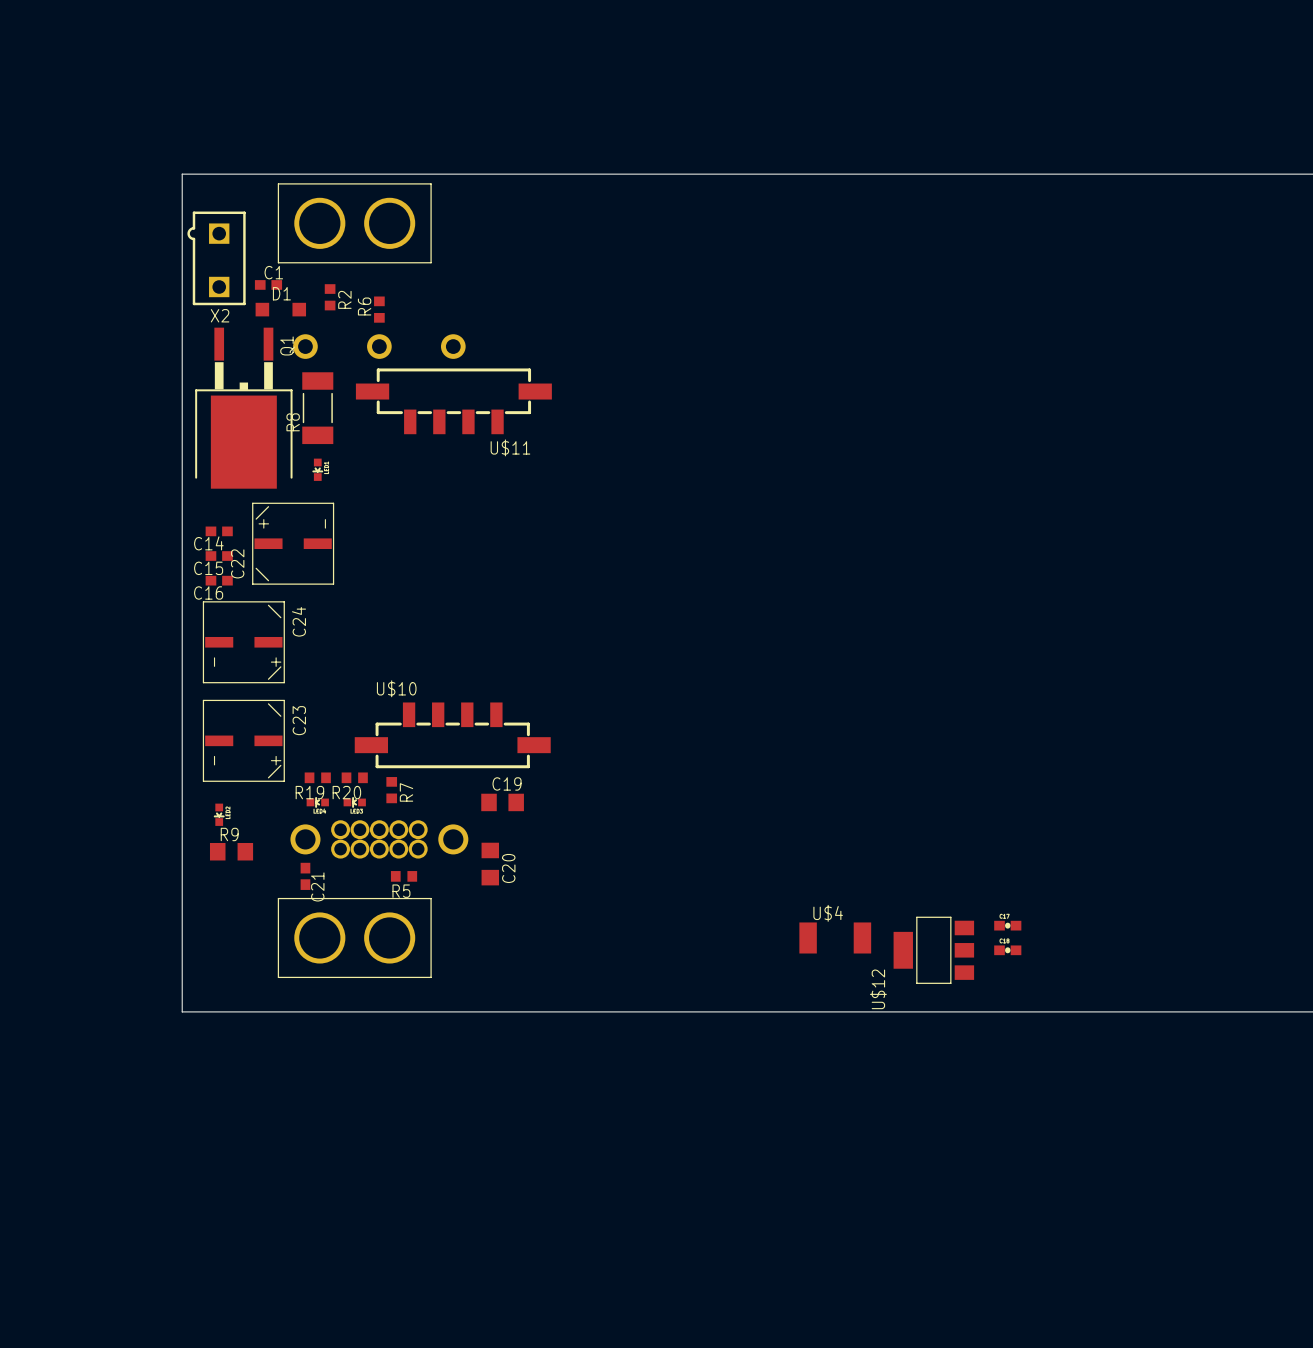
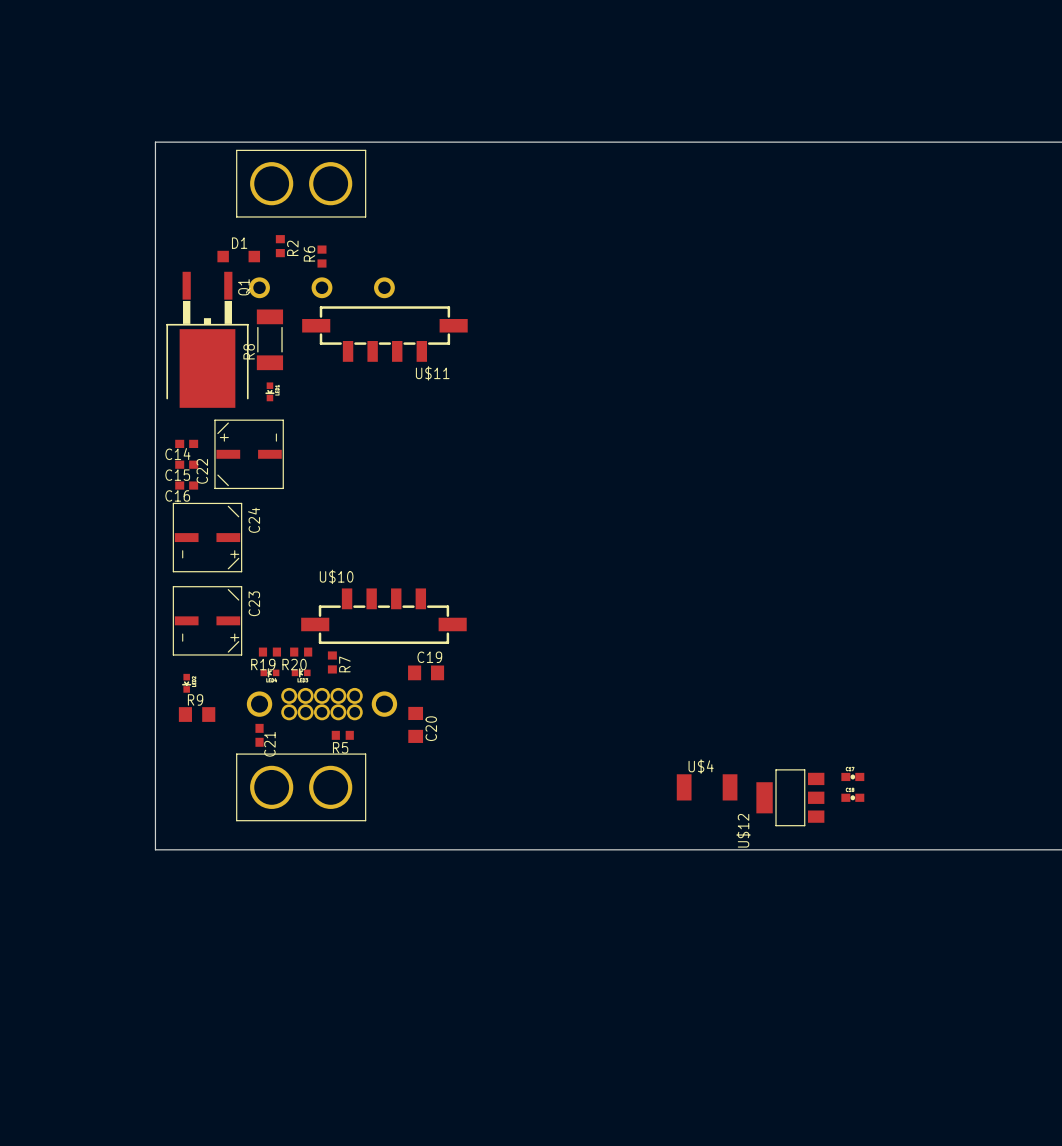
X2: (216, 258) -> none
C1: (268, 284) -> none

